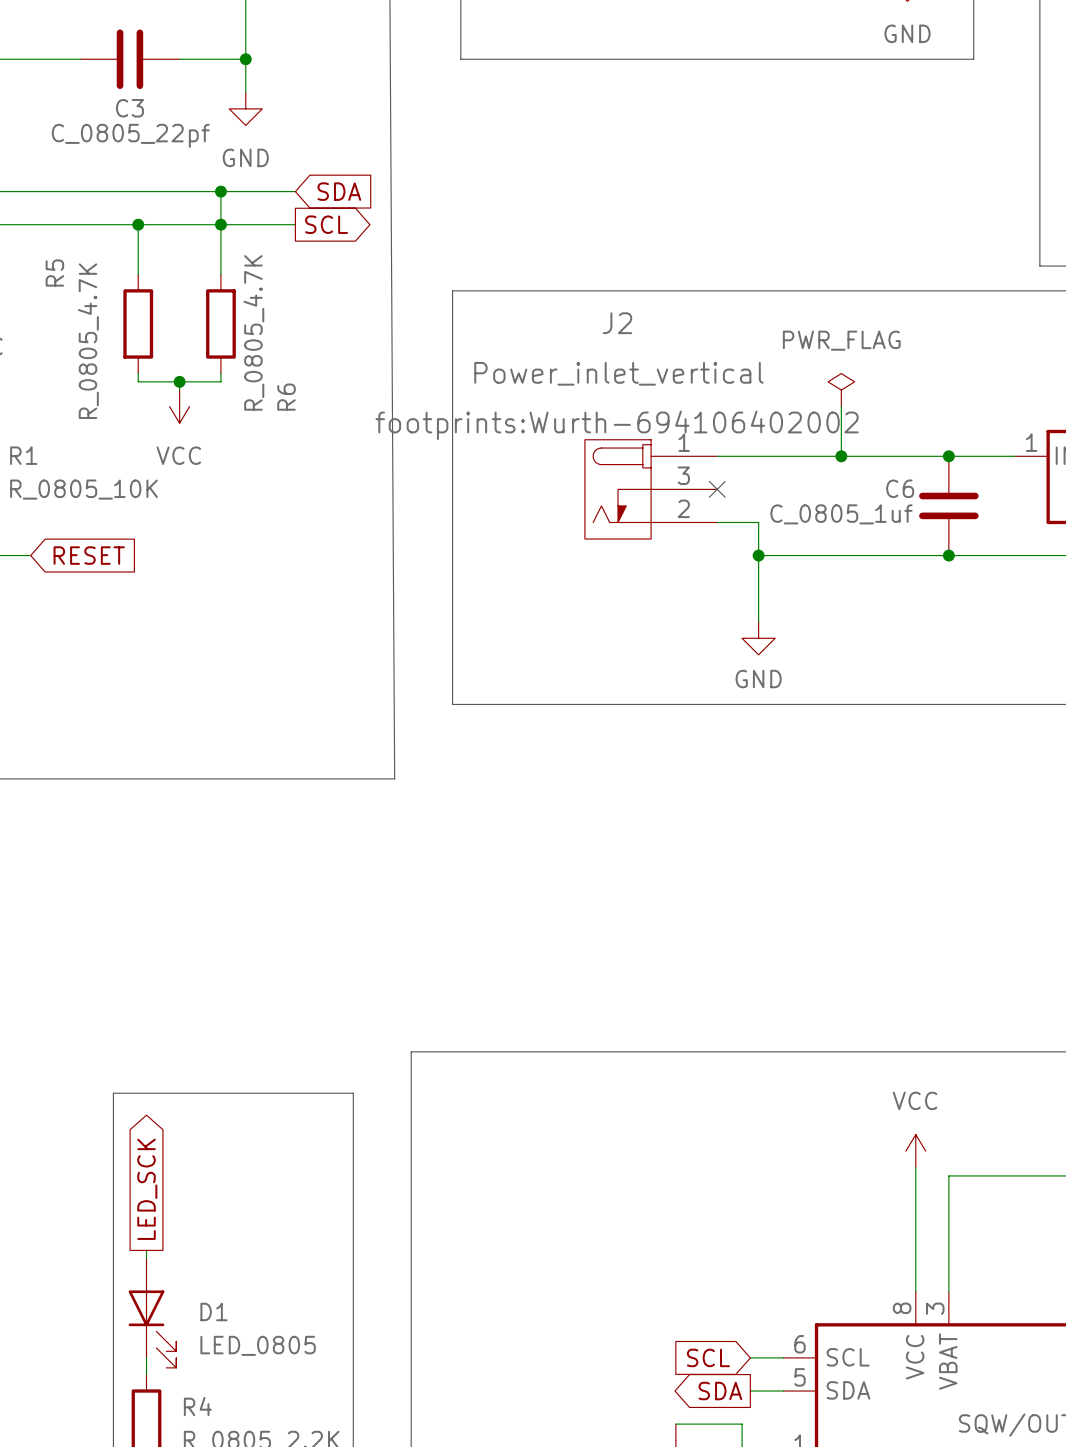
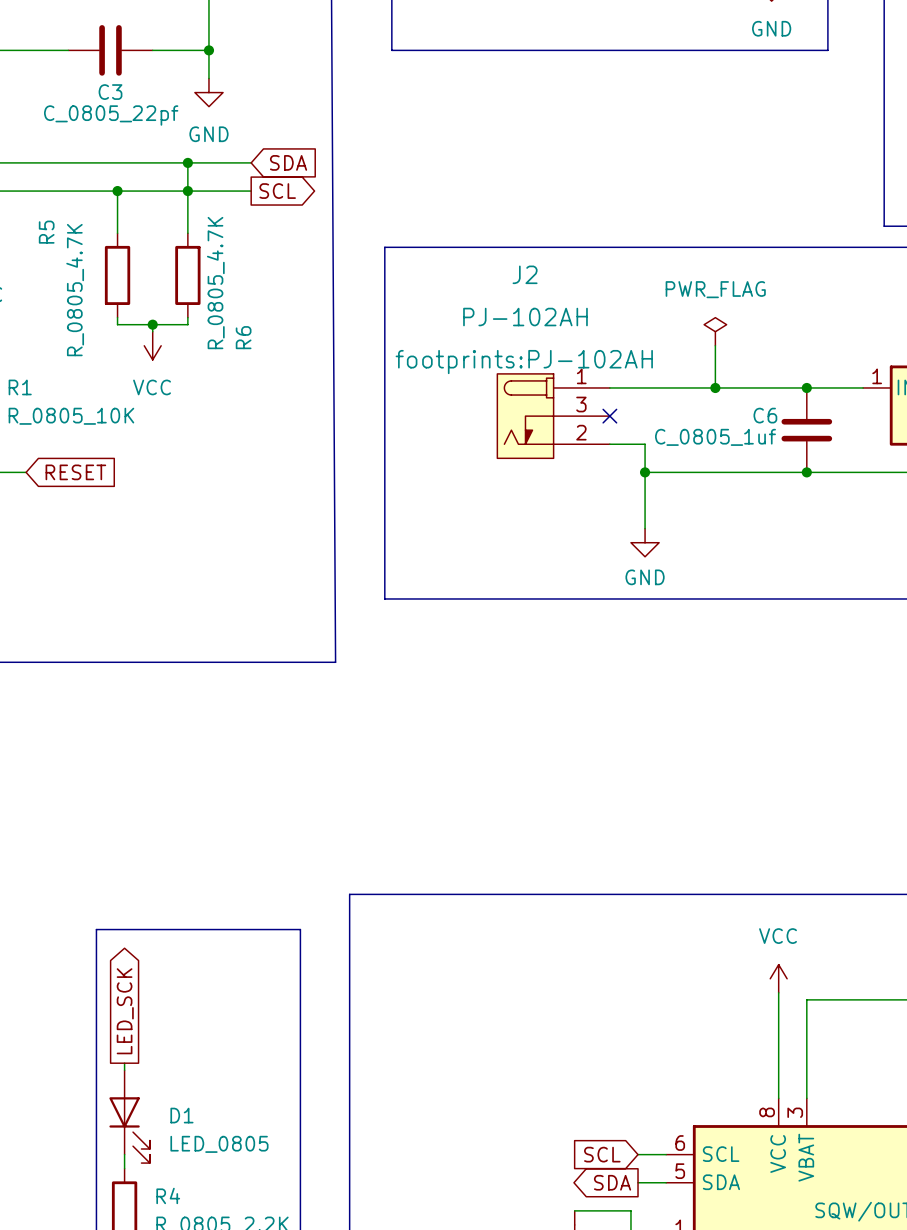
J2 value: Power_inlet_vertical (618, 373) -> PJ-102AH (525, 317)
J2 text: footprints:Wurth-694106402002 (617, 425) -> footprints:PJ-102AH (524, 362)

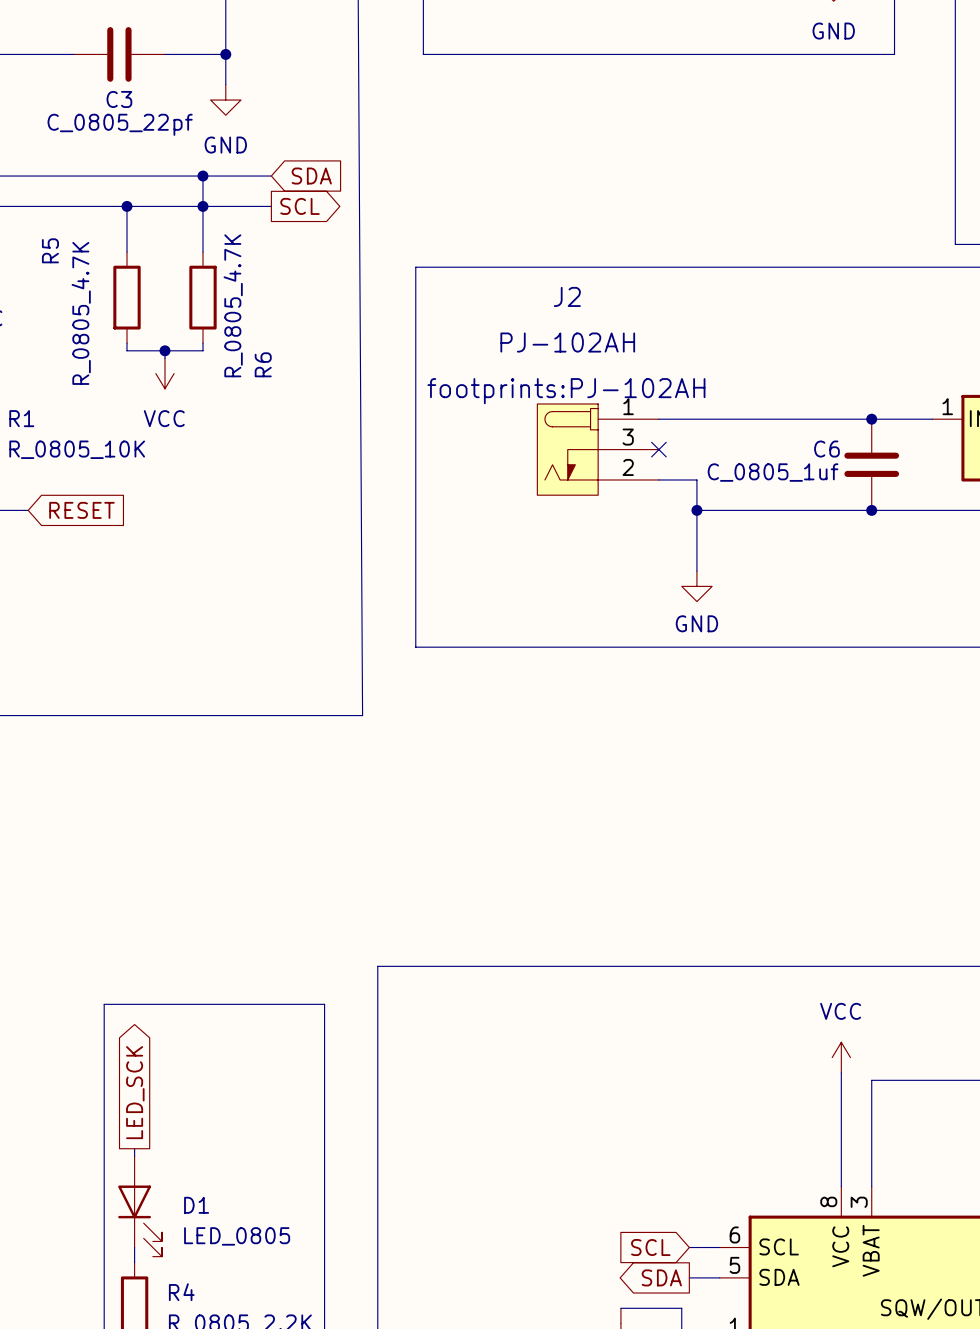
power symbol: PWR_FLAG (715, 331) -> none
wire: (715, 345) (715, 387) -> none
junction: (715, 387) -> none

